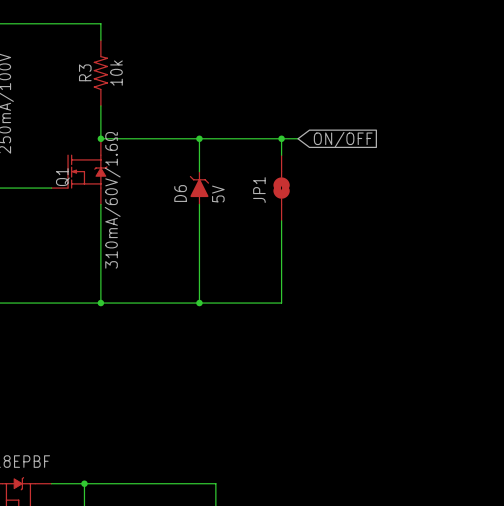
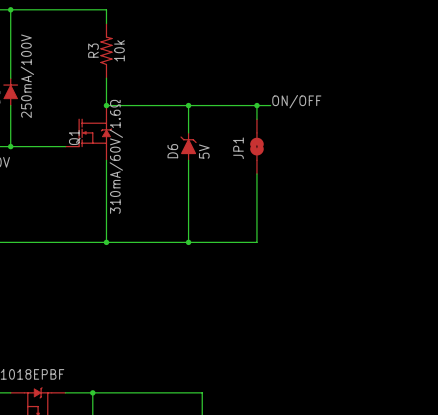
label: none -> ON/OFF (296, 101)
global label: ON/OFF (343, 139) -> none

